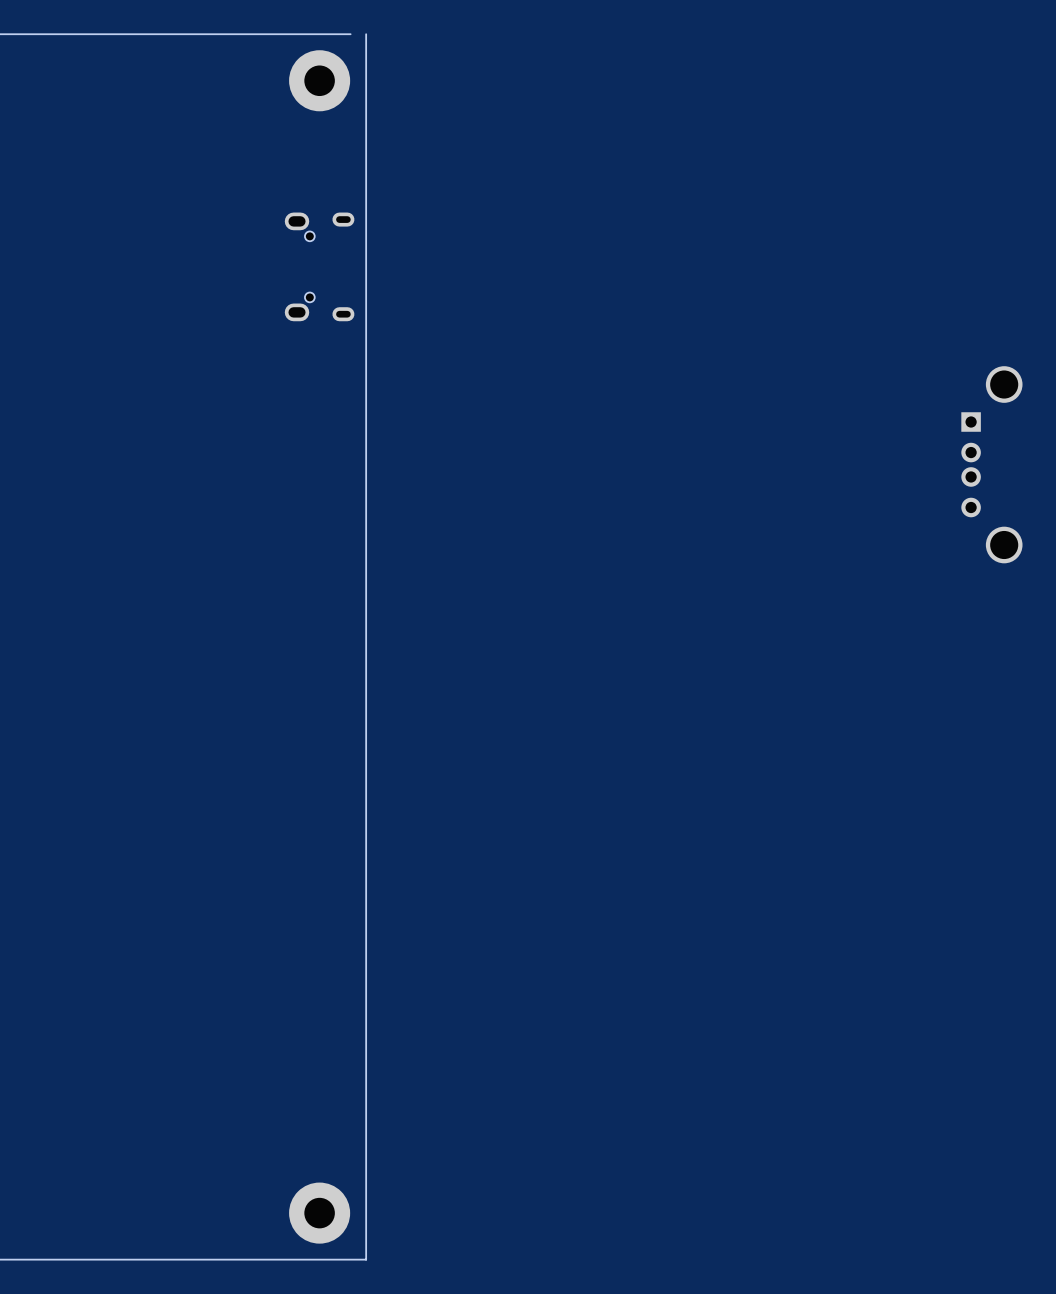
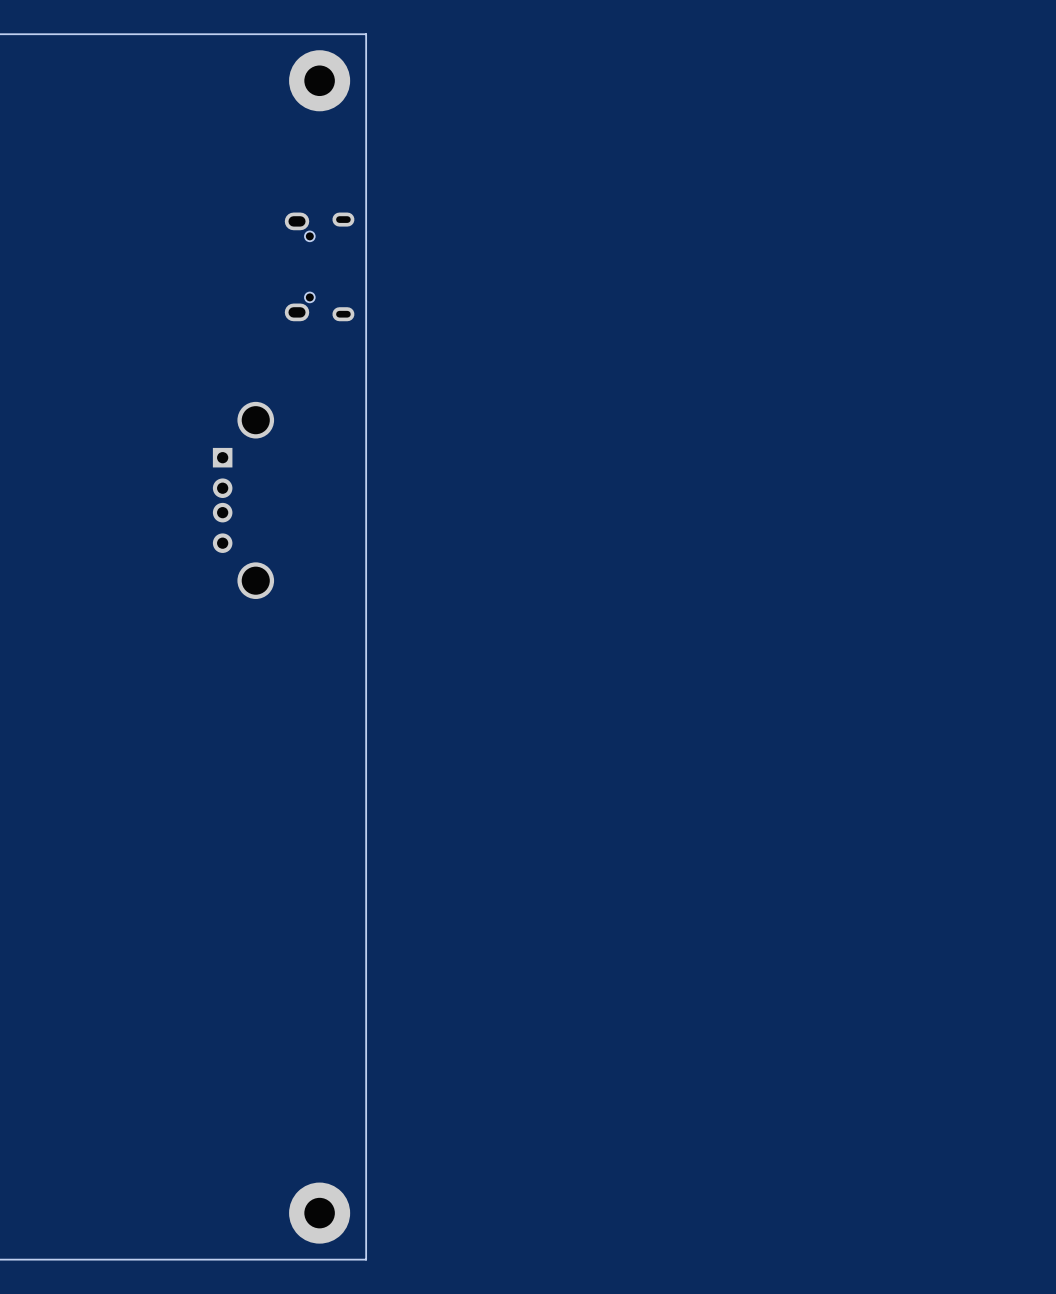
board edge: none -> (366, 34) (350, 34)
part: (991, 464) -> none
part: none -> (243, 500)

